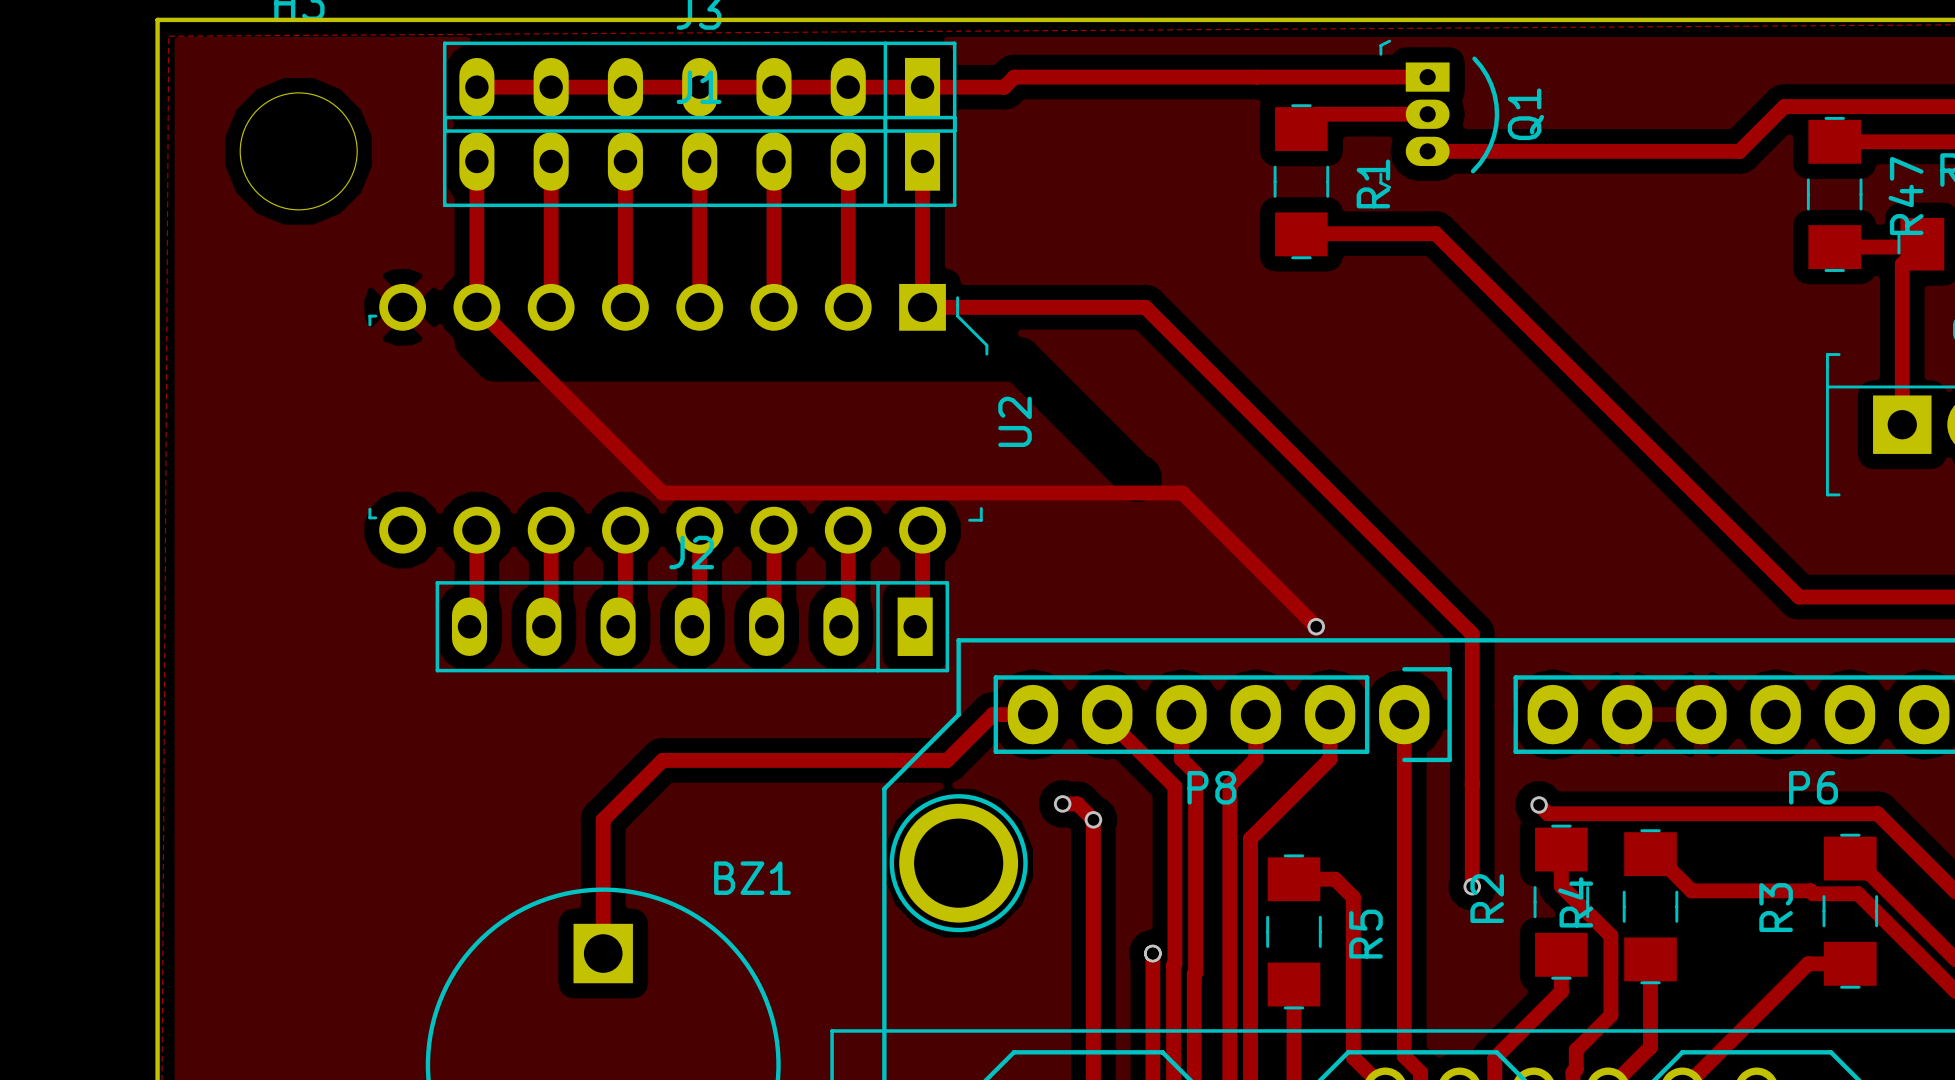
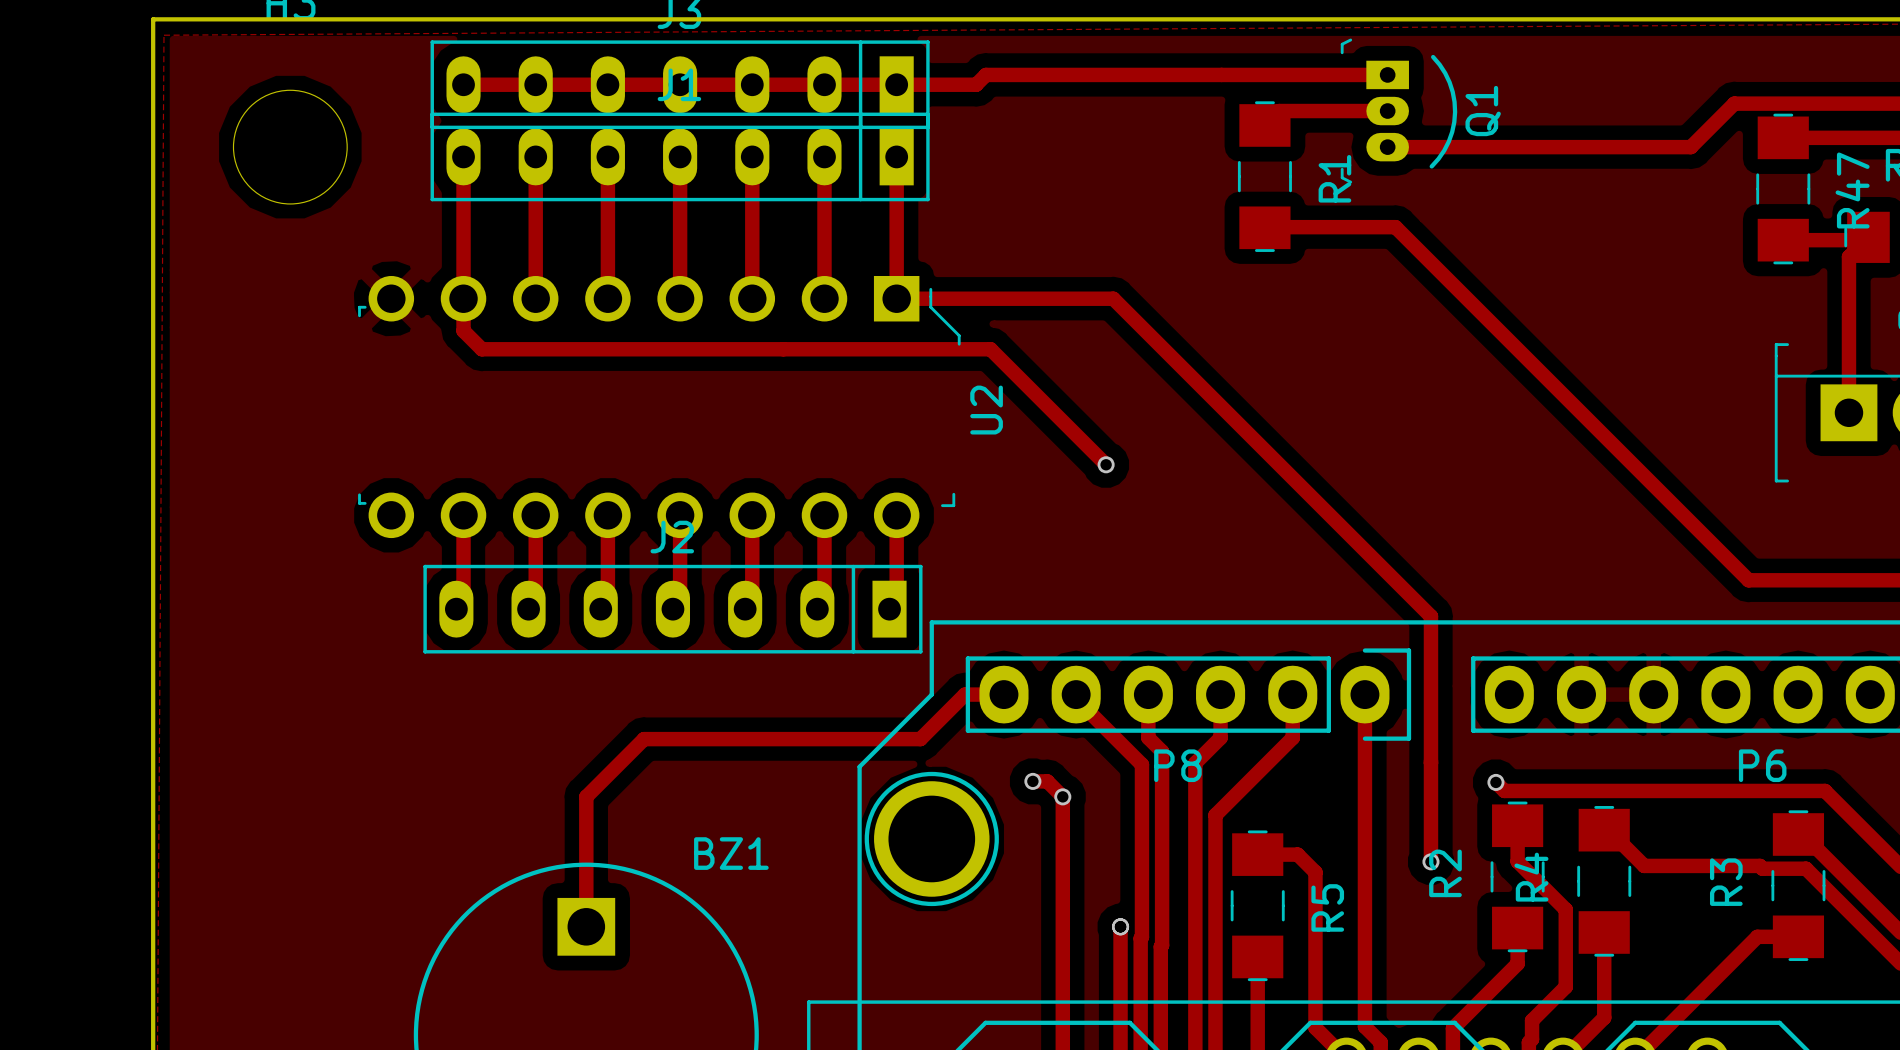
track: (476, 307) (662, 493) (1182, 493) (1316, 626) -> (463, 298) (463, 330) (481, 349) (990, 349) (1106, 464)
via: none -> (1106, 464)
via: (1316, 626) -> none

